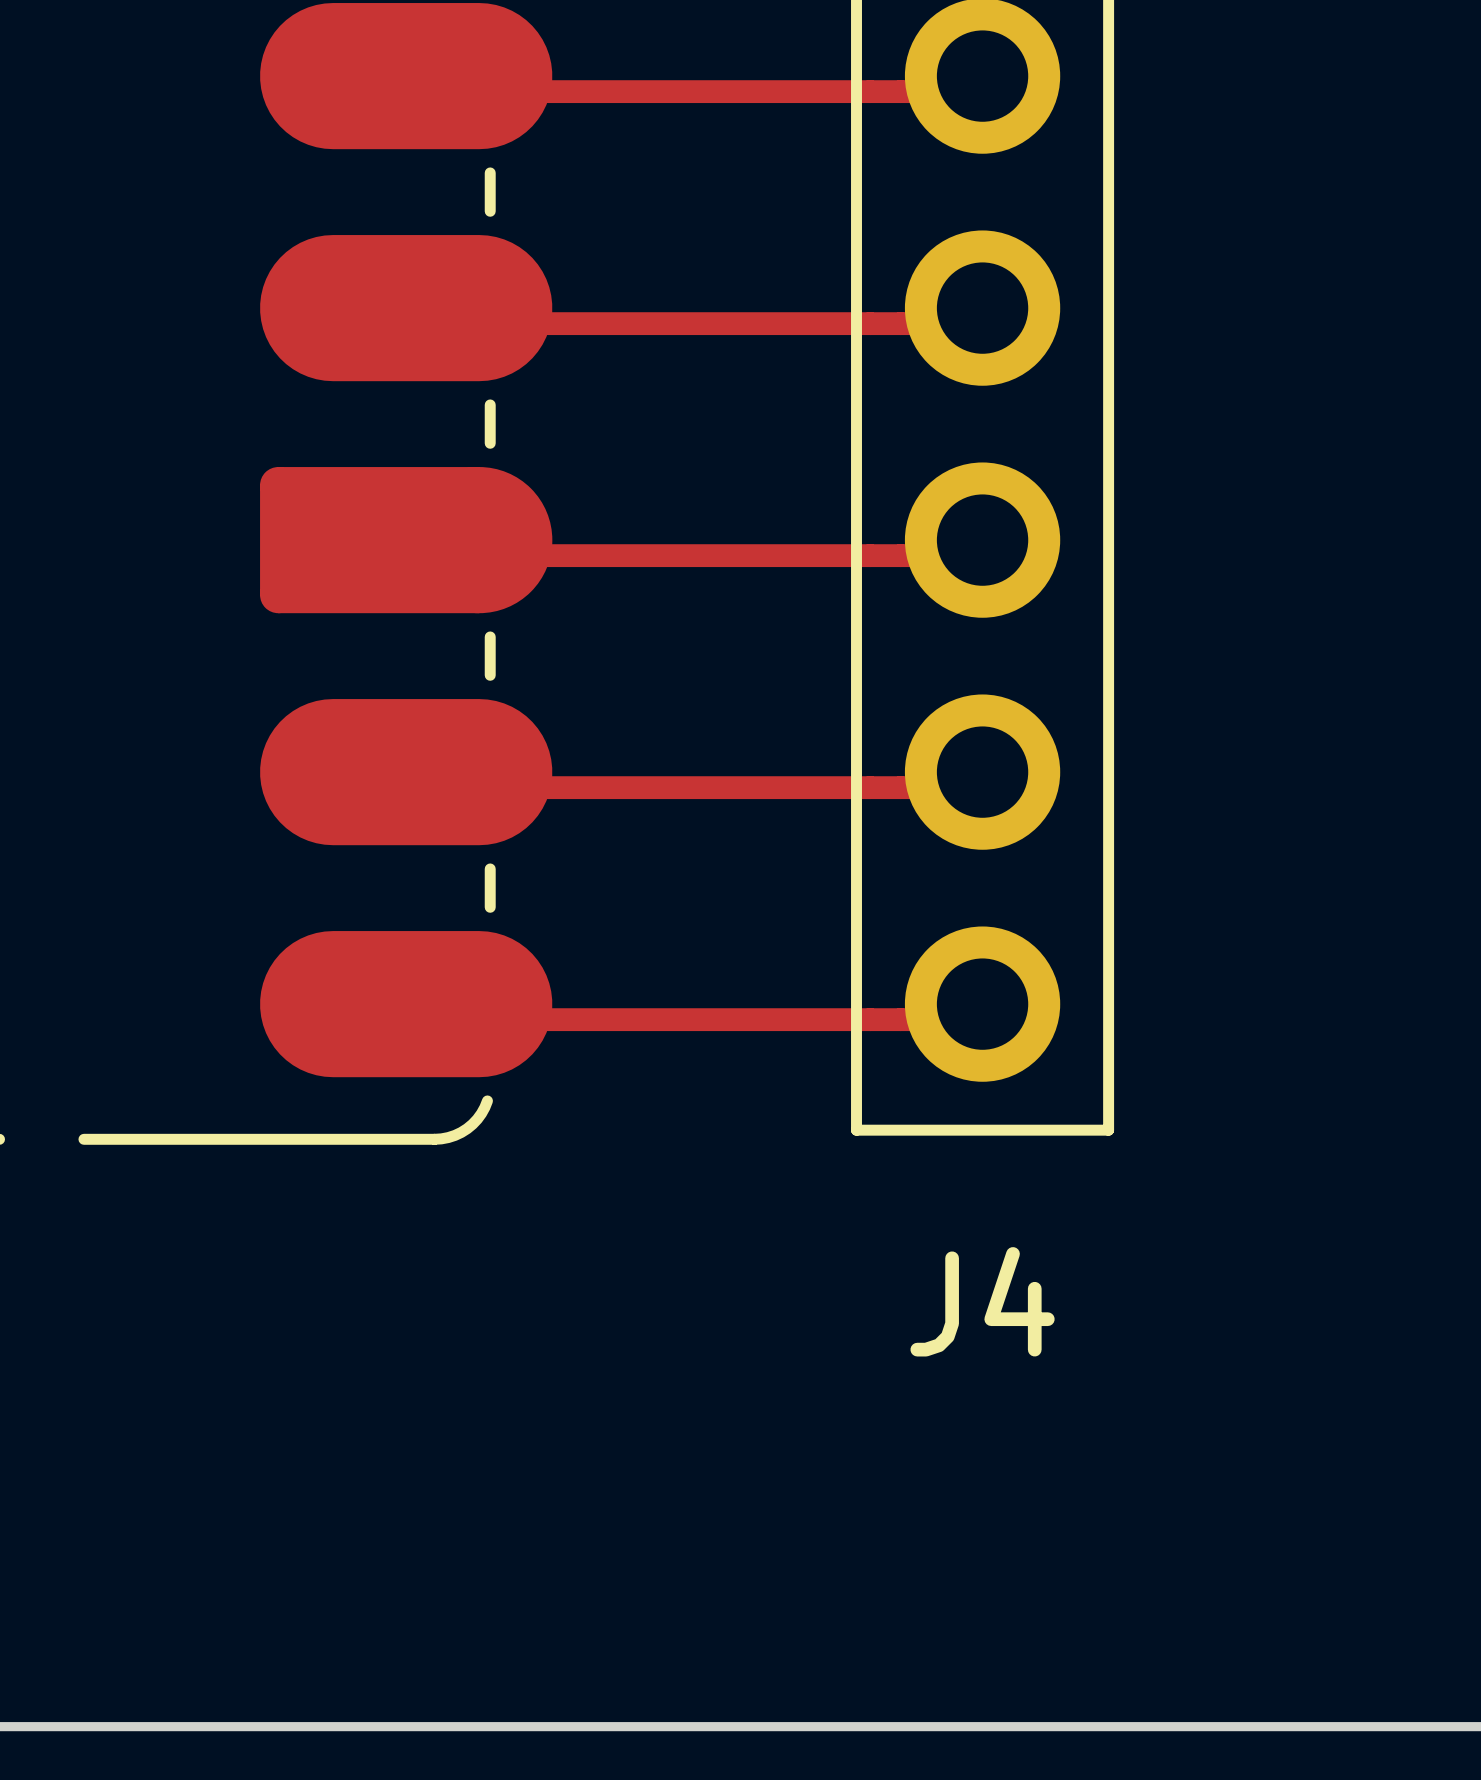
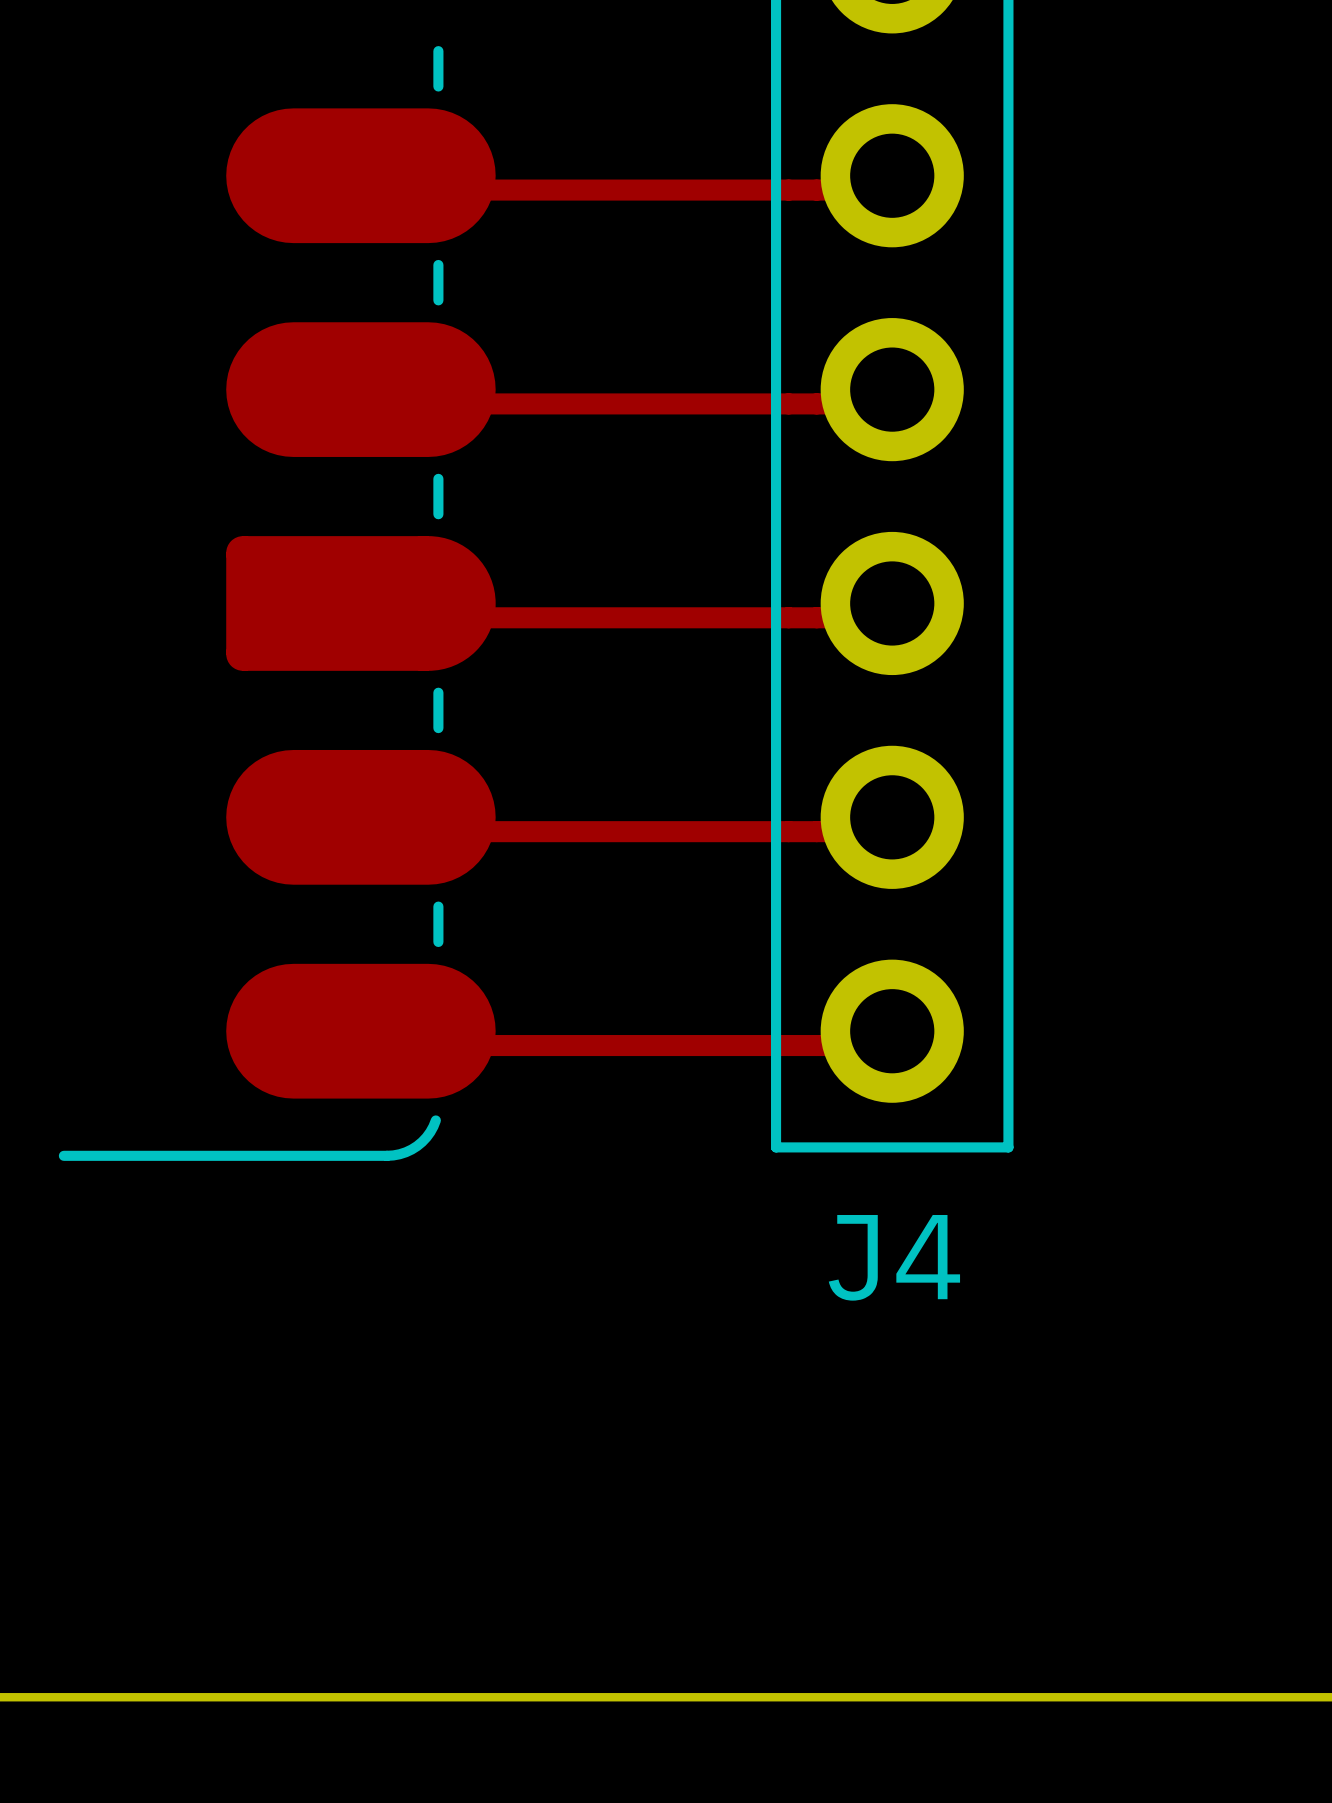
J4 name position: J4 (982, 1301) -> J4 (894, 1257)

